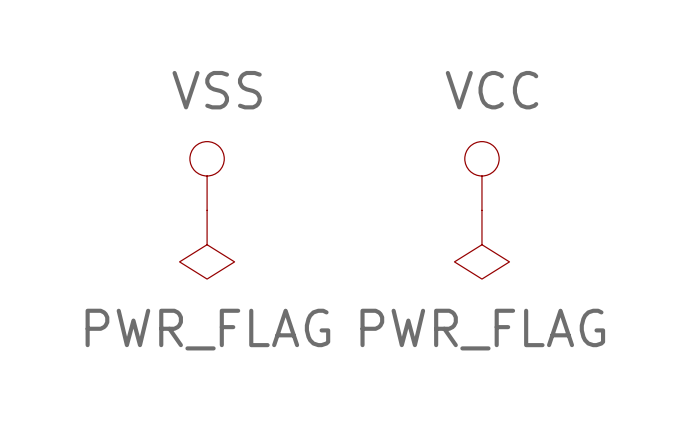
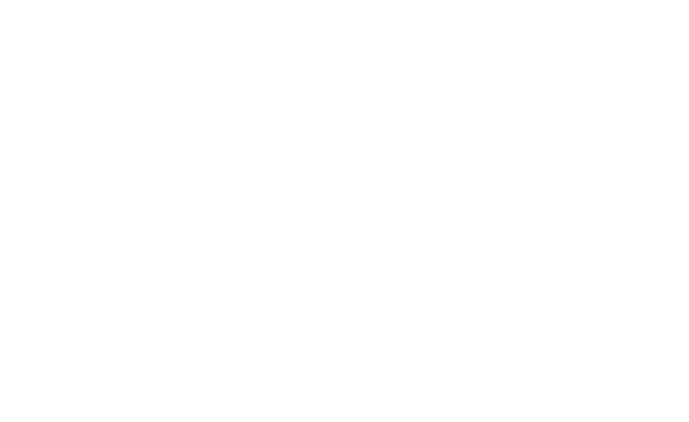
power symbol: VSS (207, 175) -> none
power symbol: VCC (481, 175) -> none
power symbol: PWR_FLAG (207, 244) -> none
power symbol: PWR_FLAG (481, 244) -> none

